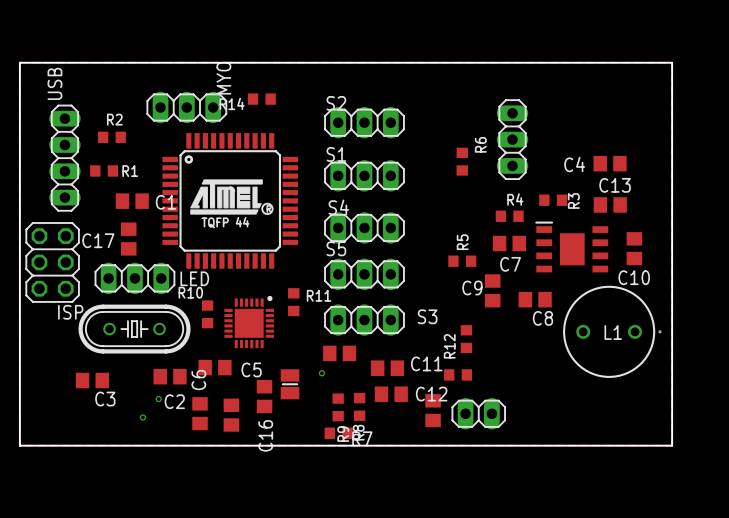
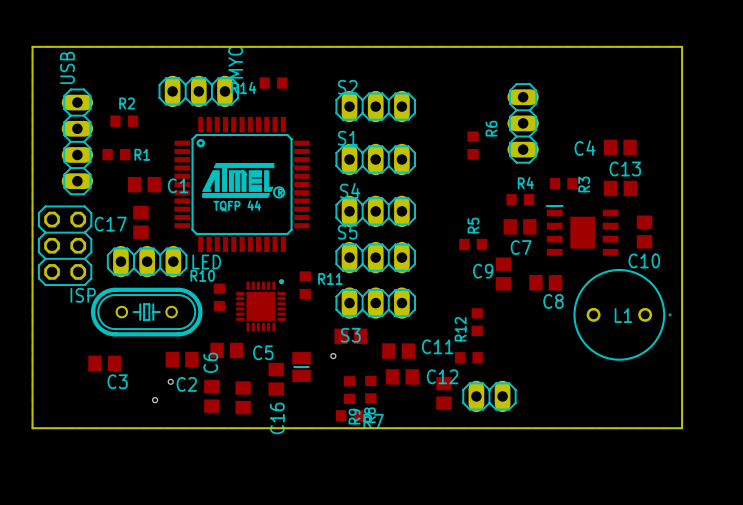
S3 name position: S3 (427, 316) -> S3 (350, 335)

